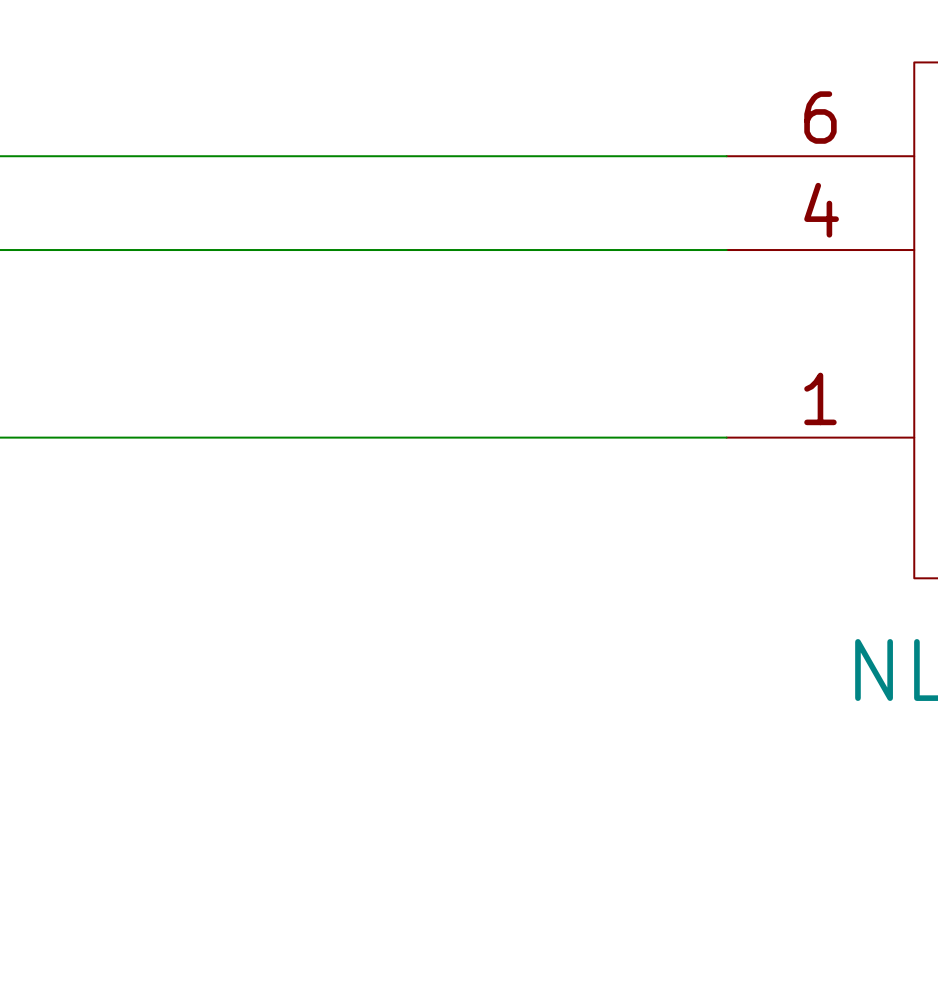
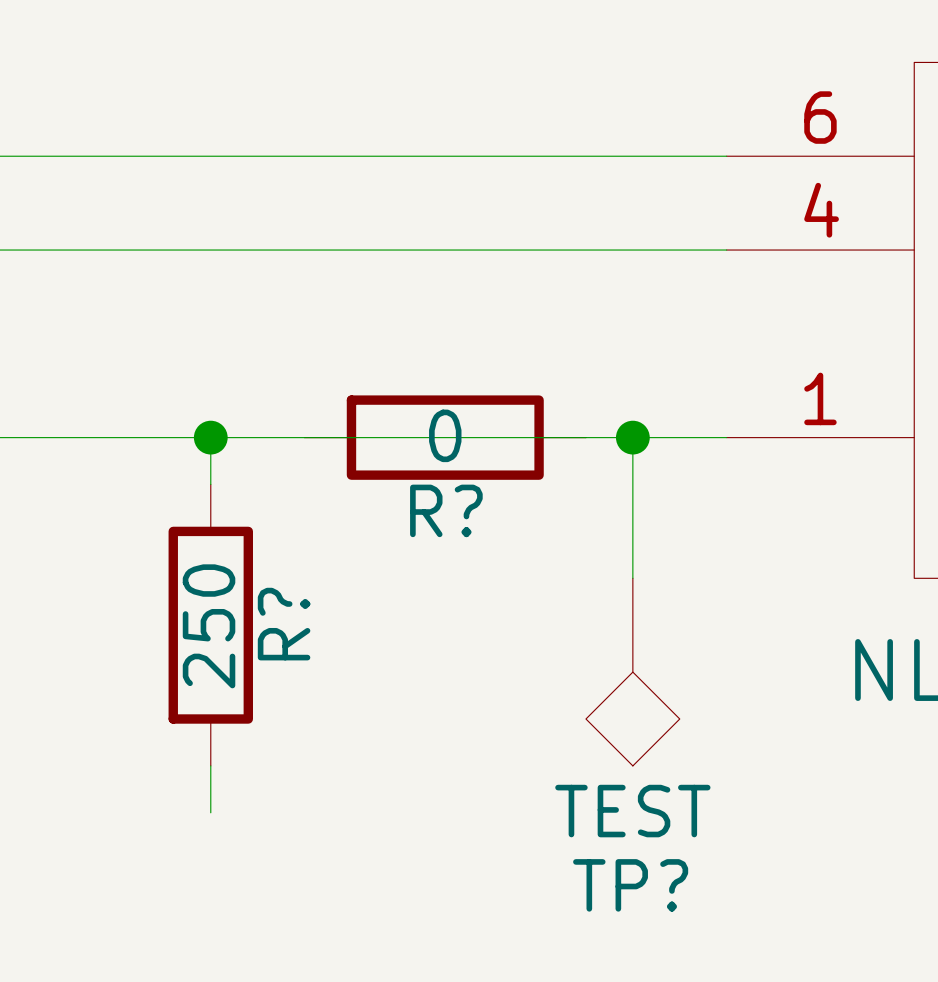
wire: none -> (210, 437) (210, 484)
junction: none -> (210, 437)
R?: none -> 0 (445, 437)
wire: none -> (632, 437) (632, 578)
junction: none -> (632, 437)
R?: none -> 250 (210, 625)
TP?: none -> TEST (632, 672)
wire: none -> (210, 765) (210, 812)

